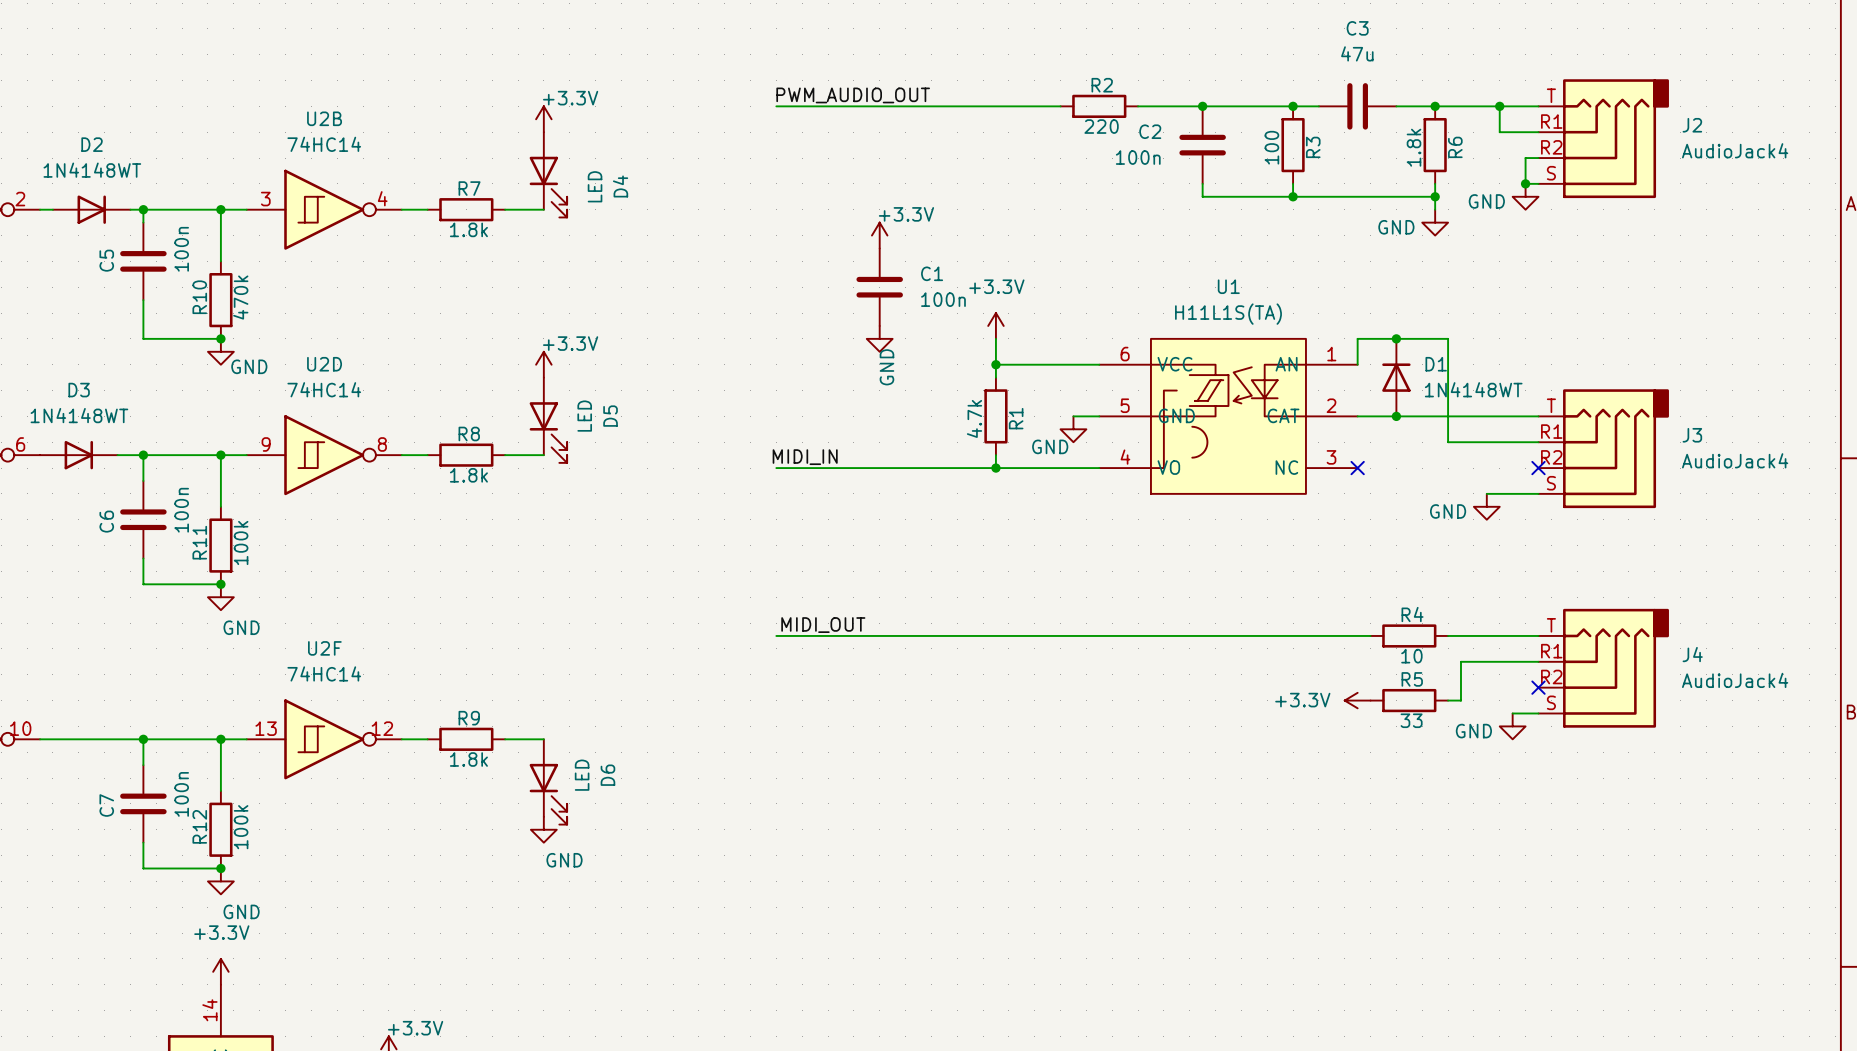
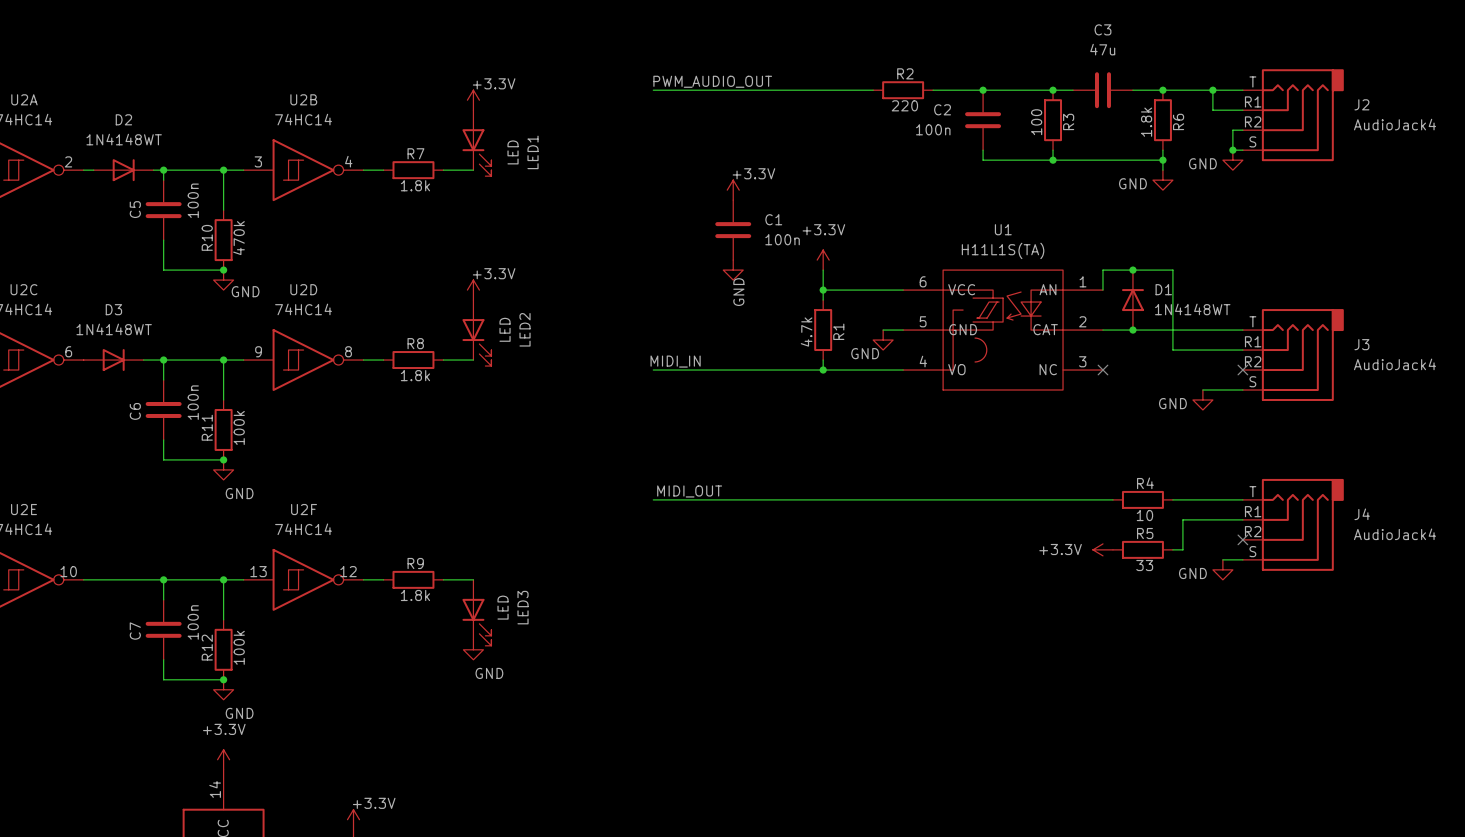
D4 name: D4 (620, 186) -> LED1 (533, 152)
D5 name: D5 (610, 416) -> LED2 (525, 329)
D6 name: D6 (607, 775) -> LED3 (523, 607)

